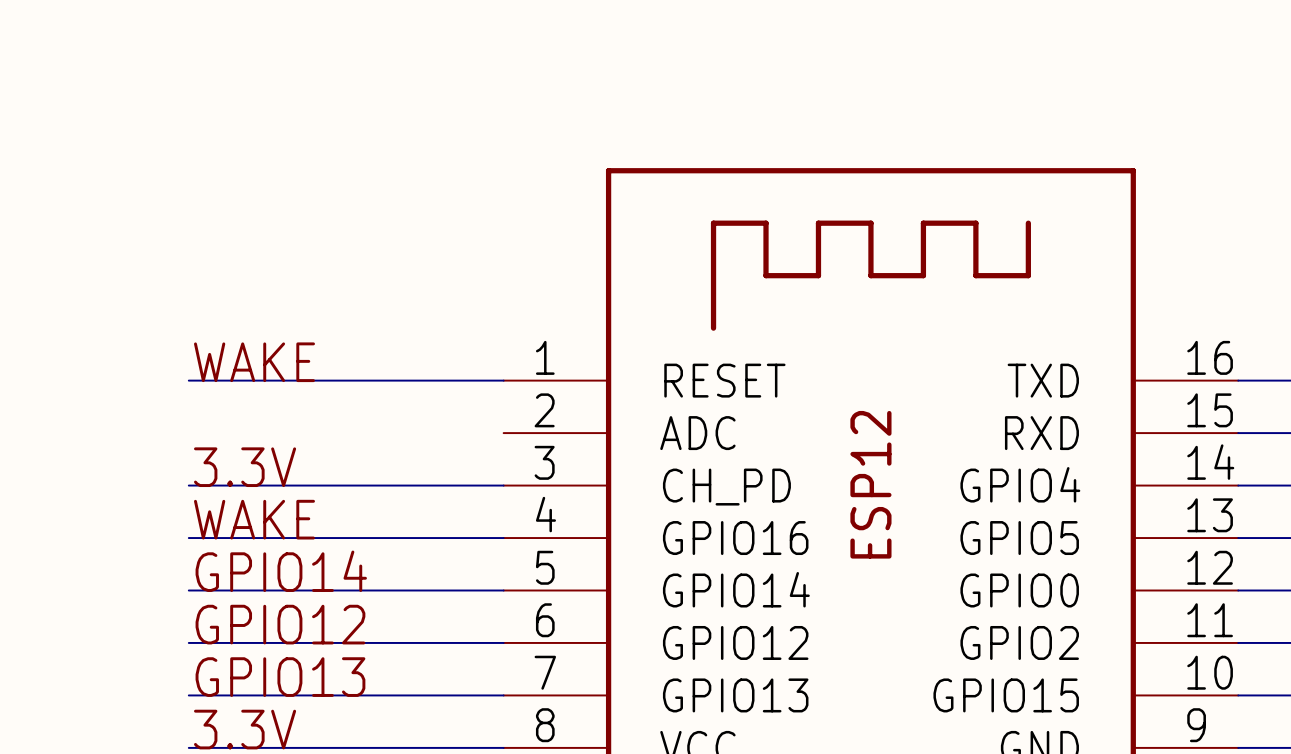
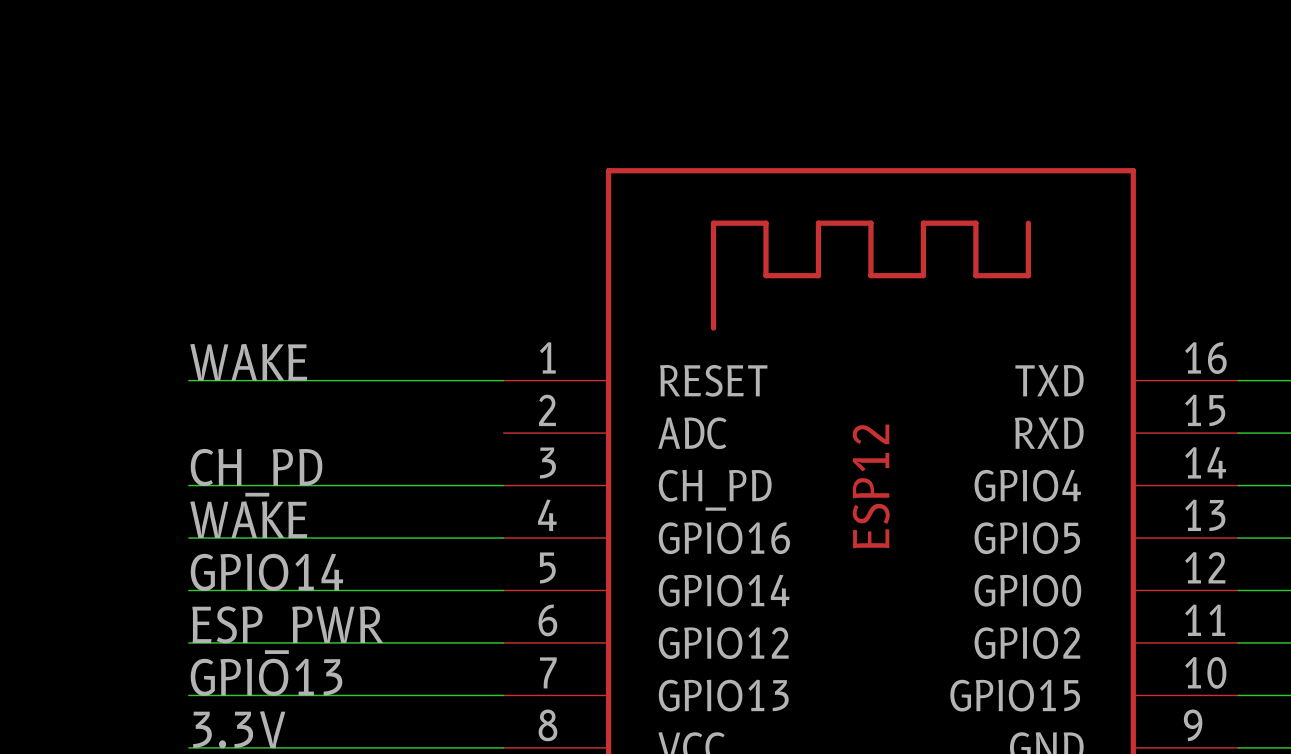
label: 3.3V (245, 467) -> CH_PD (256, 472)
label: GPIO12 (280, 624) -> ESP_PWR (287, 630)

